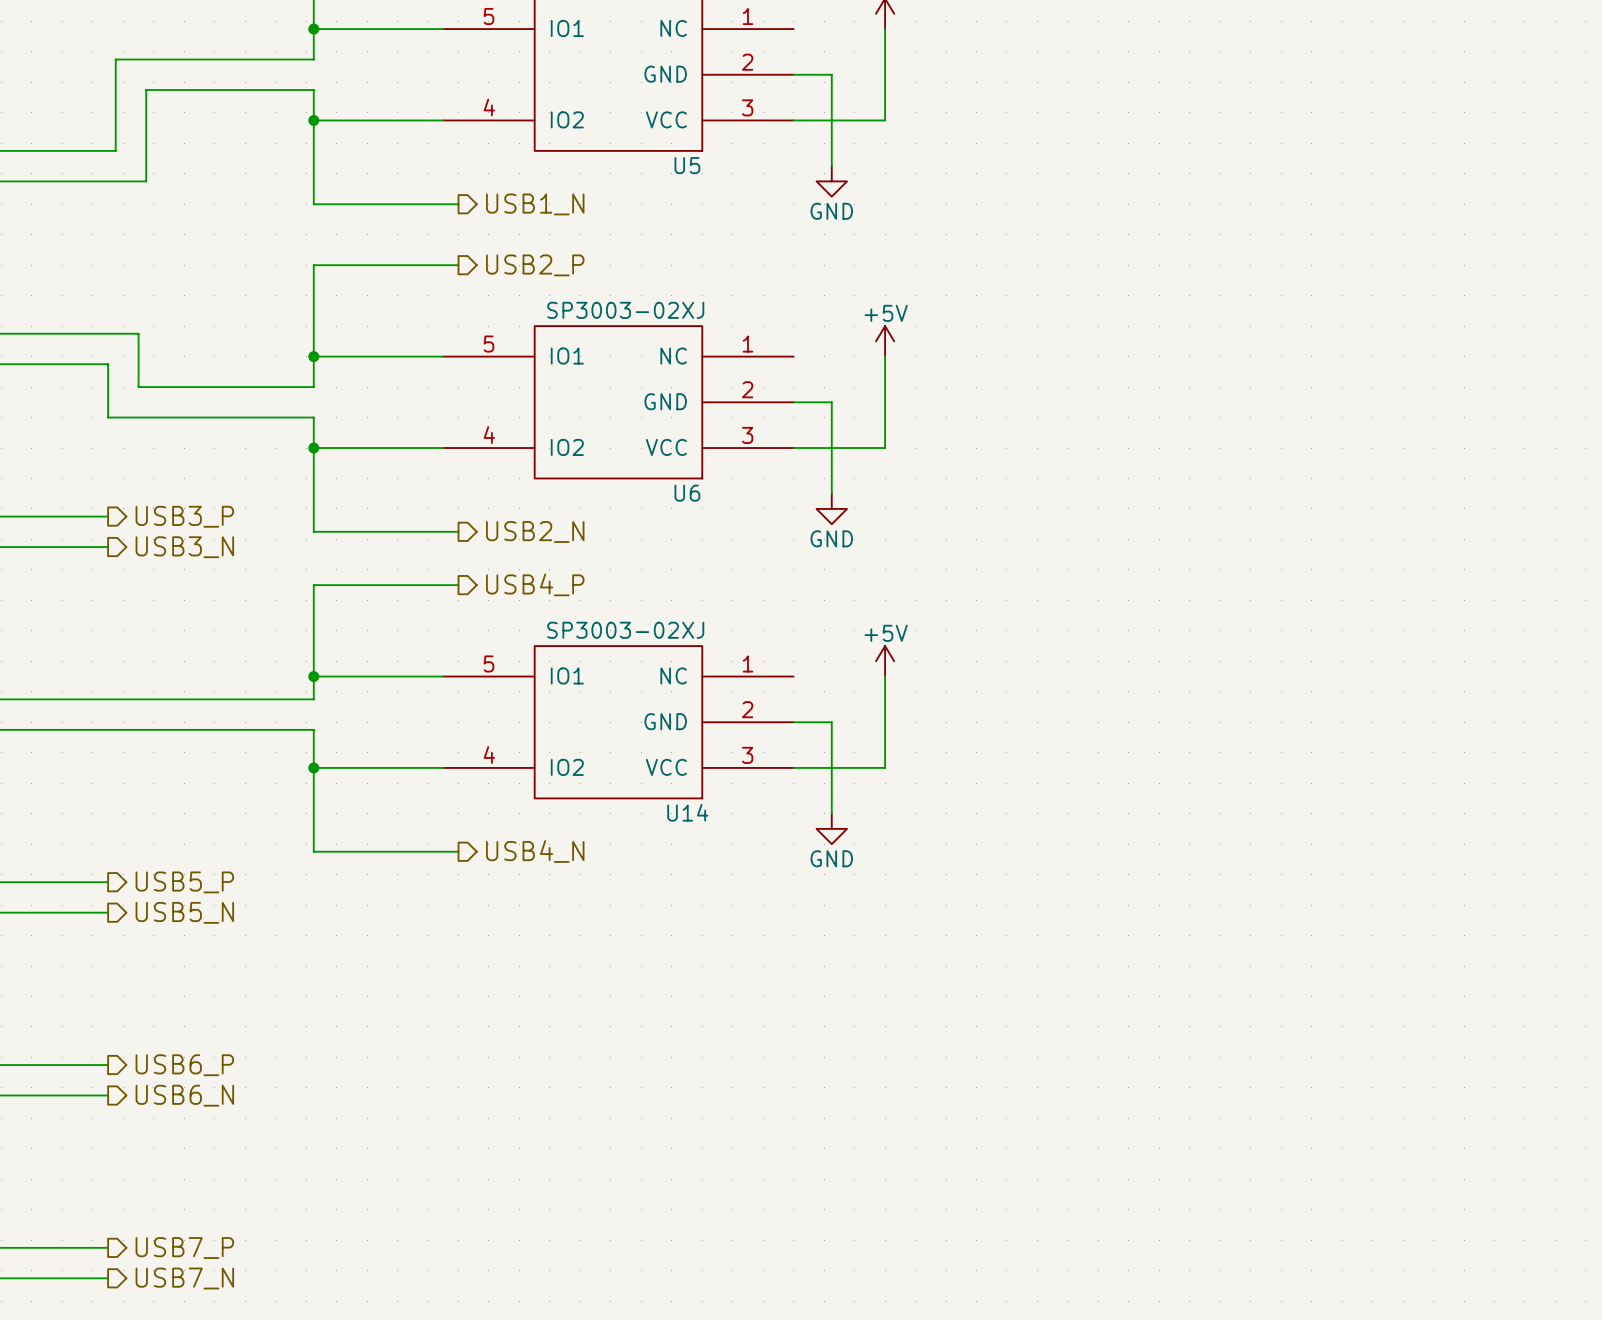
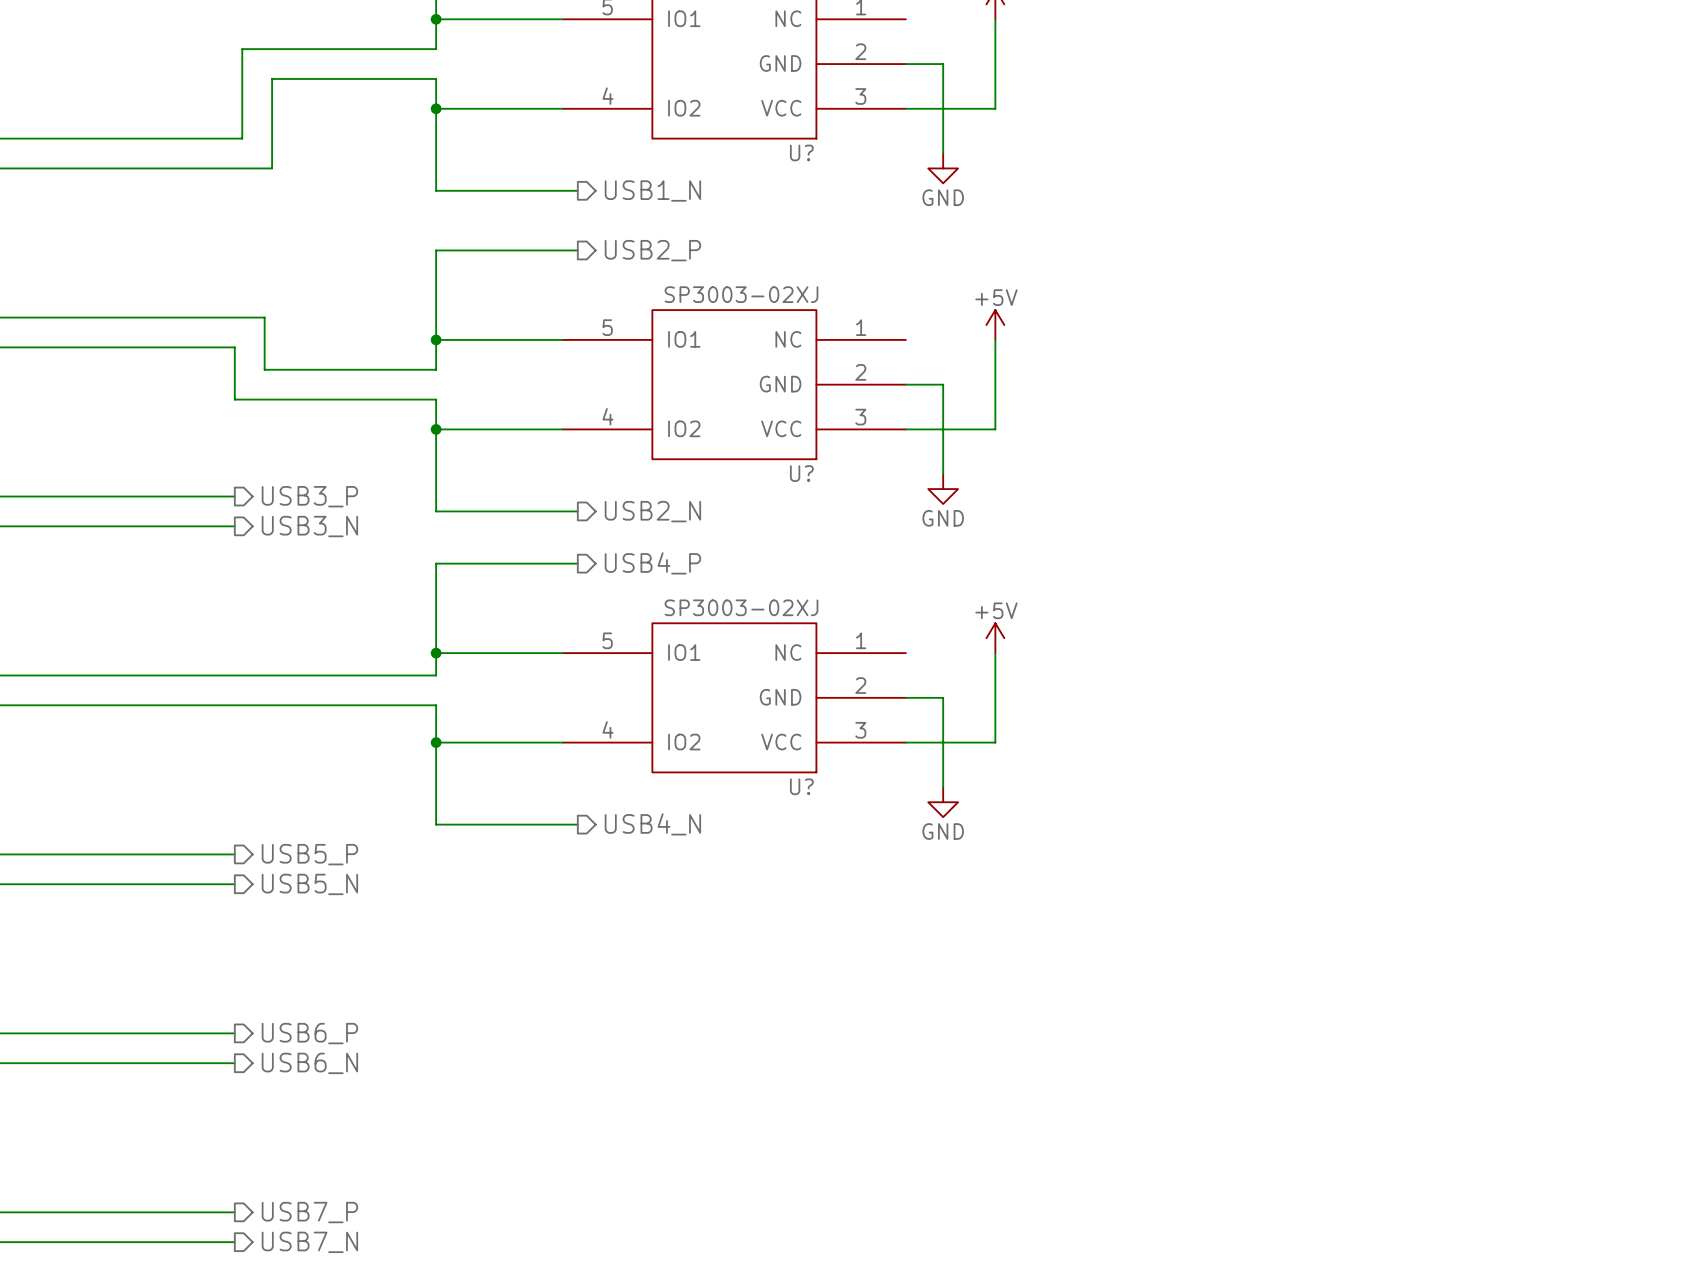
U5 name: U5 (687, 165) -> U? (801, 152)
U6 name: U6 (687, 493) -> U? (801, 473)
U14 name: U14 (687, 812) -> U? (801, 786)

